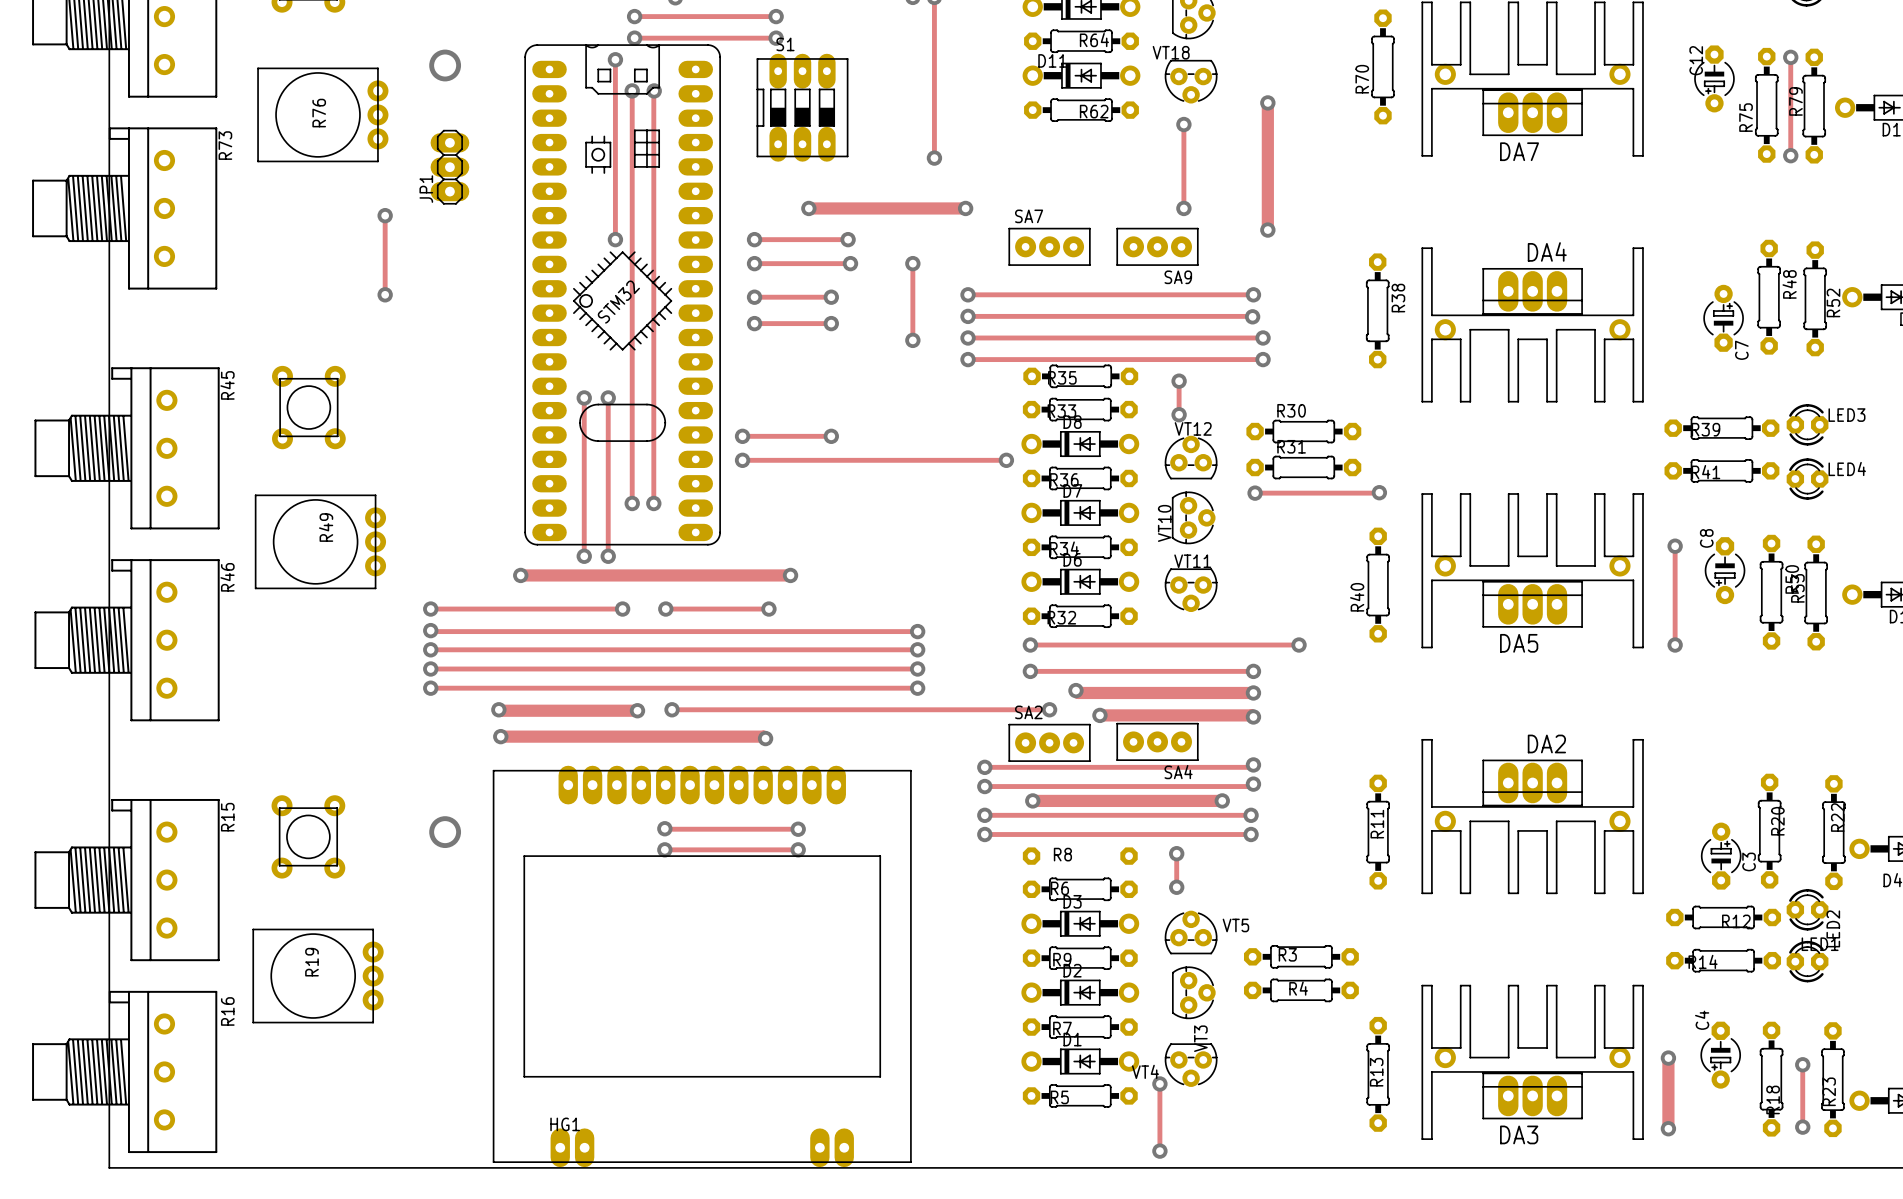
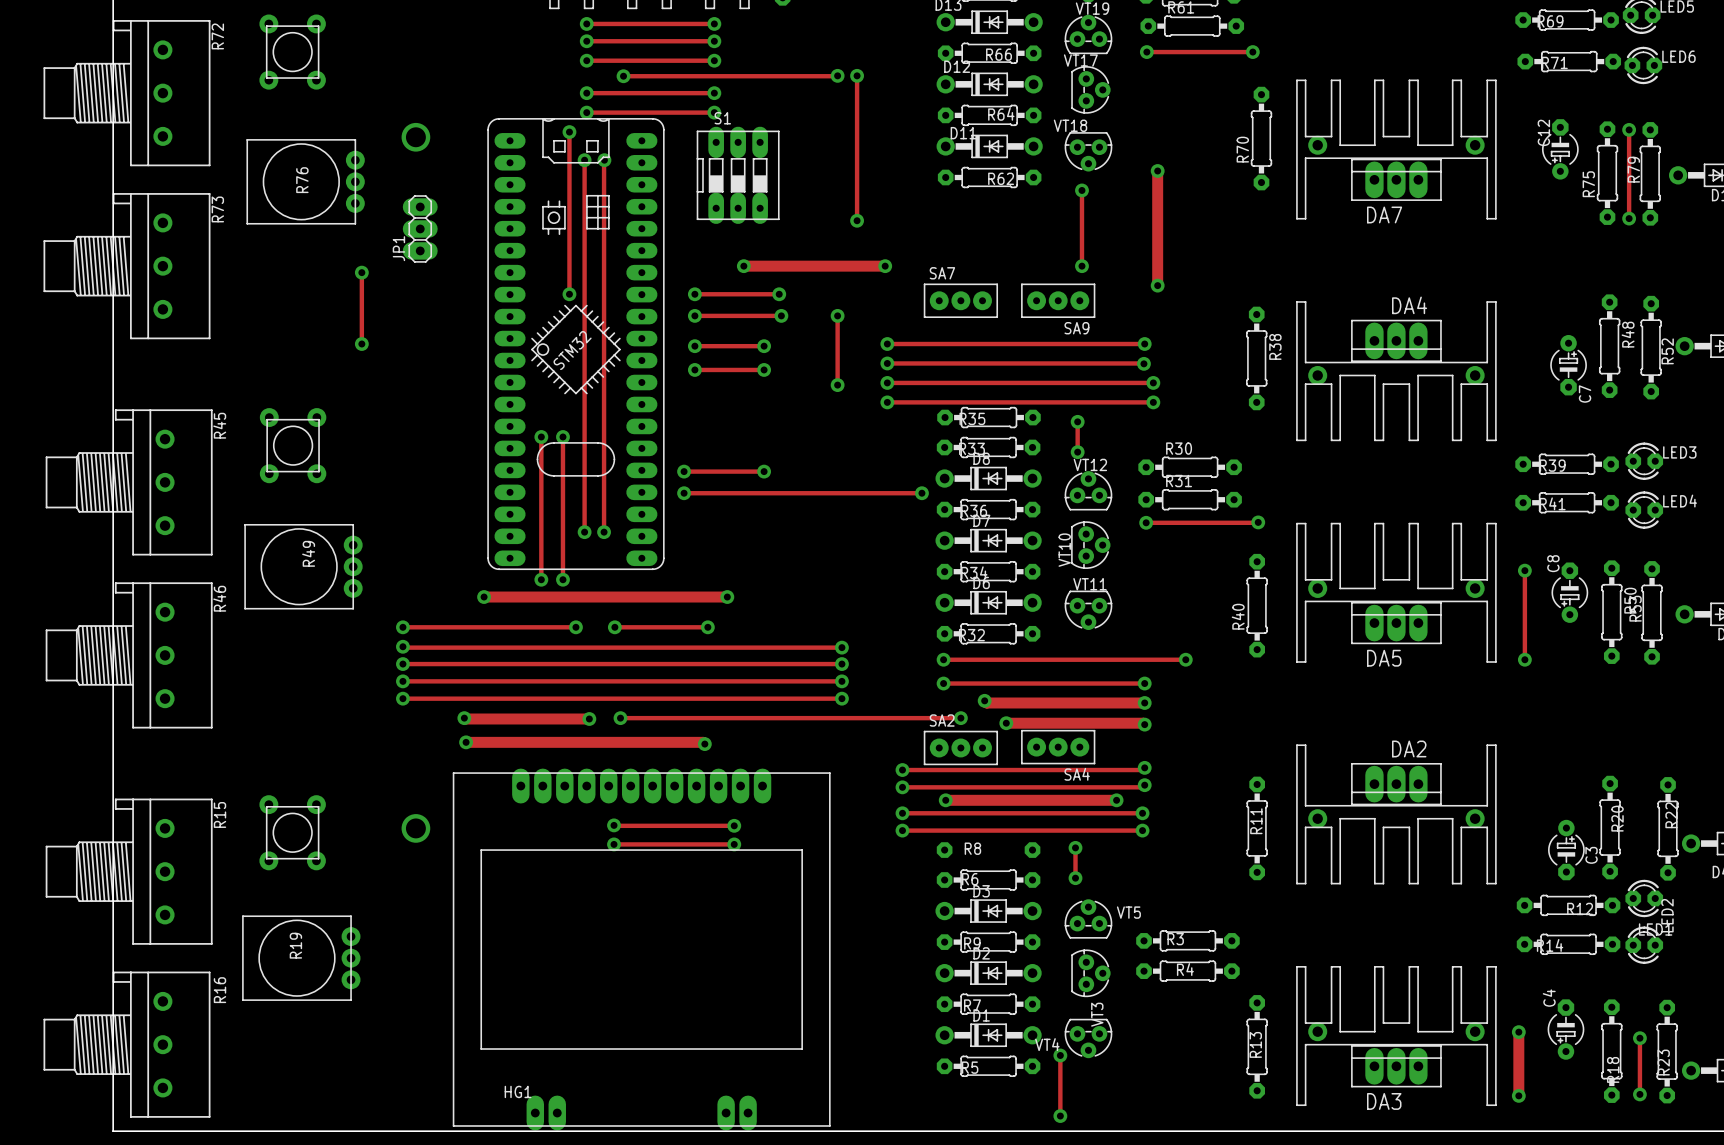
HG1 footprint: [492, 765, 912, 1168] -> [452, 768, 831, 1131]

